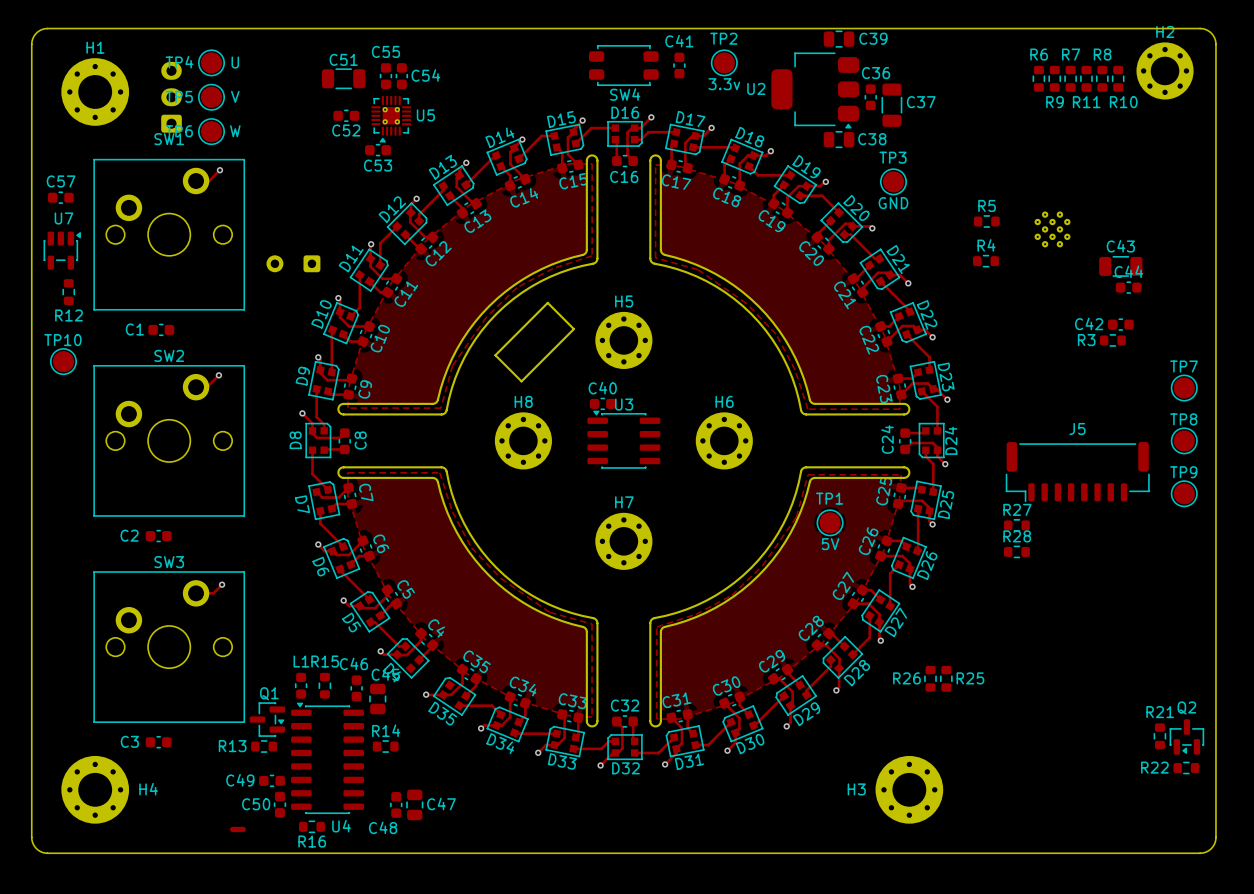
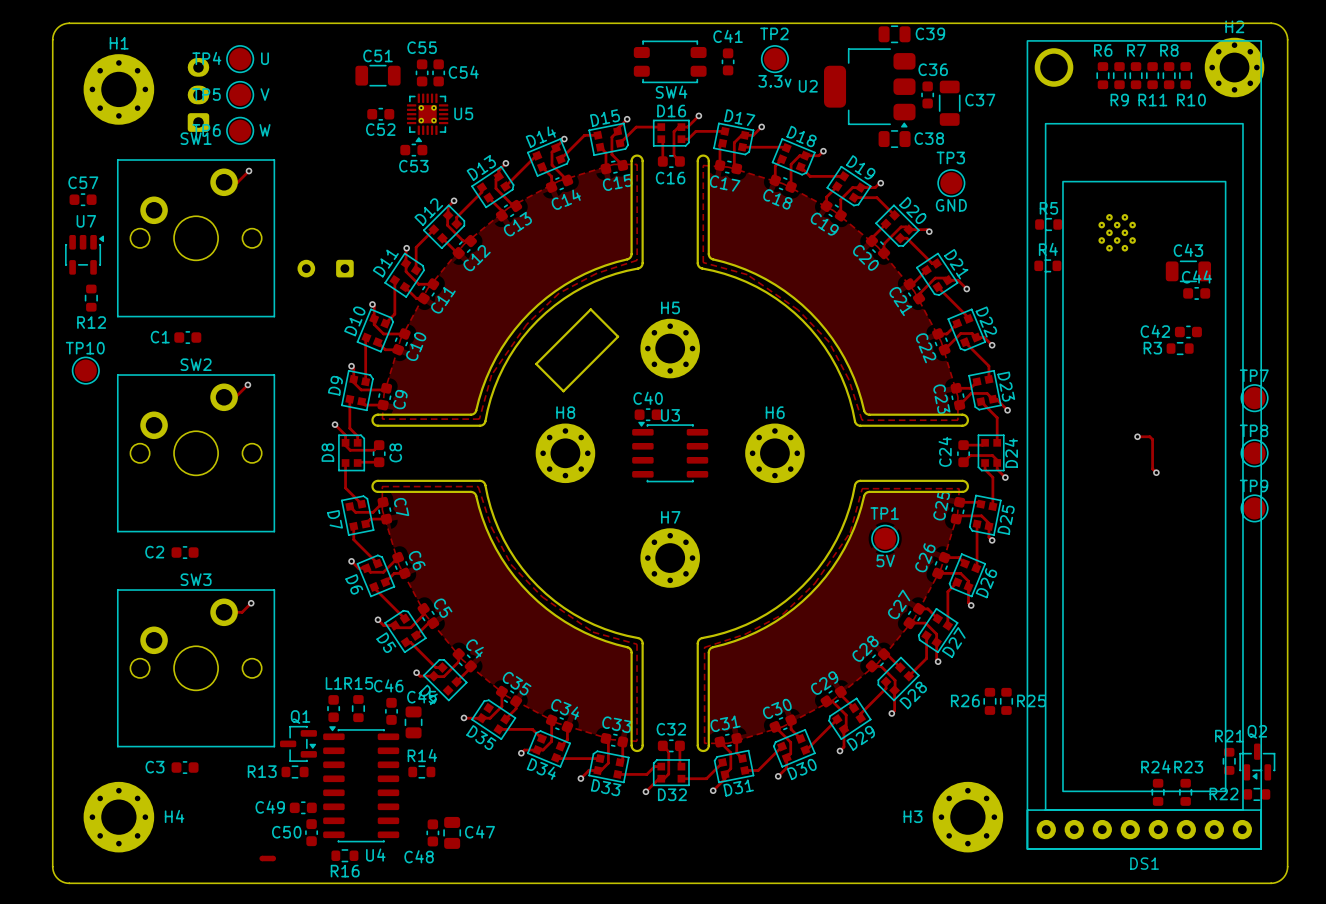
track: none -> (1137, 436) (1149, 436) (1152, 439) (1152, 468) (1156, 472)
via: none -> (1137, 436)
DS1: none -> (1144, 445)
via: none -> (1156, 472)
J5: (1077, 471) -> none
R27: (1016, 525) -> none
R28: (1016, 551) -> none
R24: none -> (1158, 792)
R23: none -> (1185, 792)

